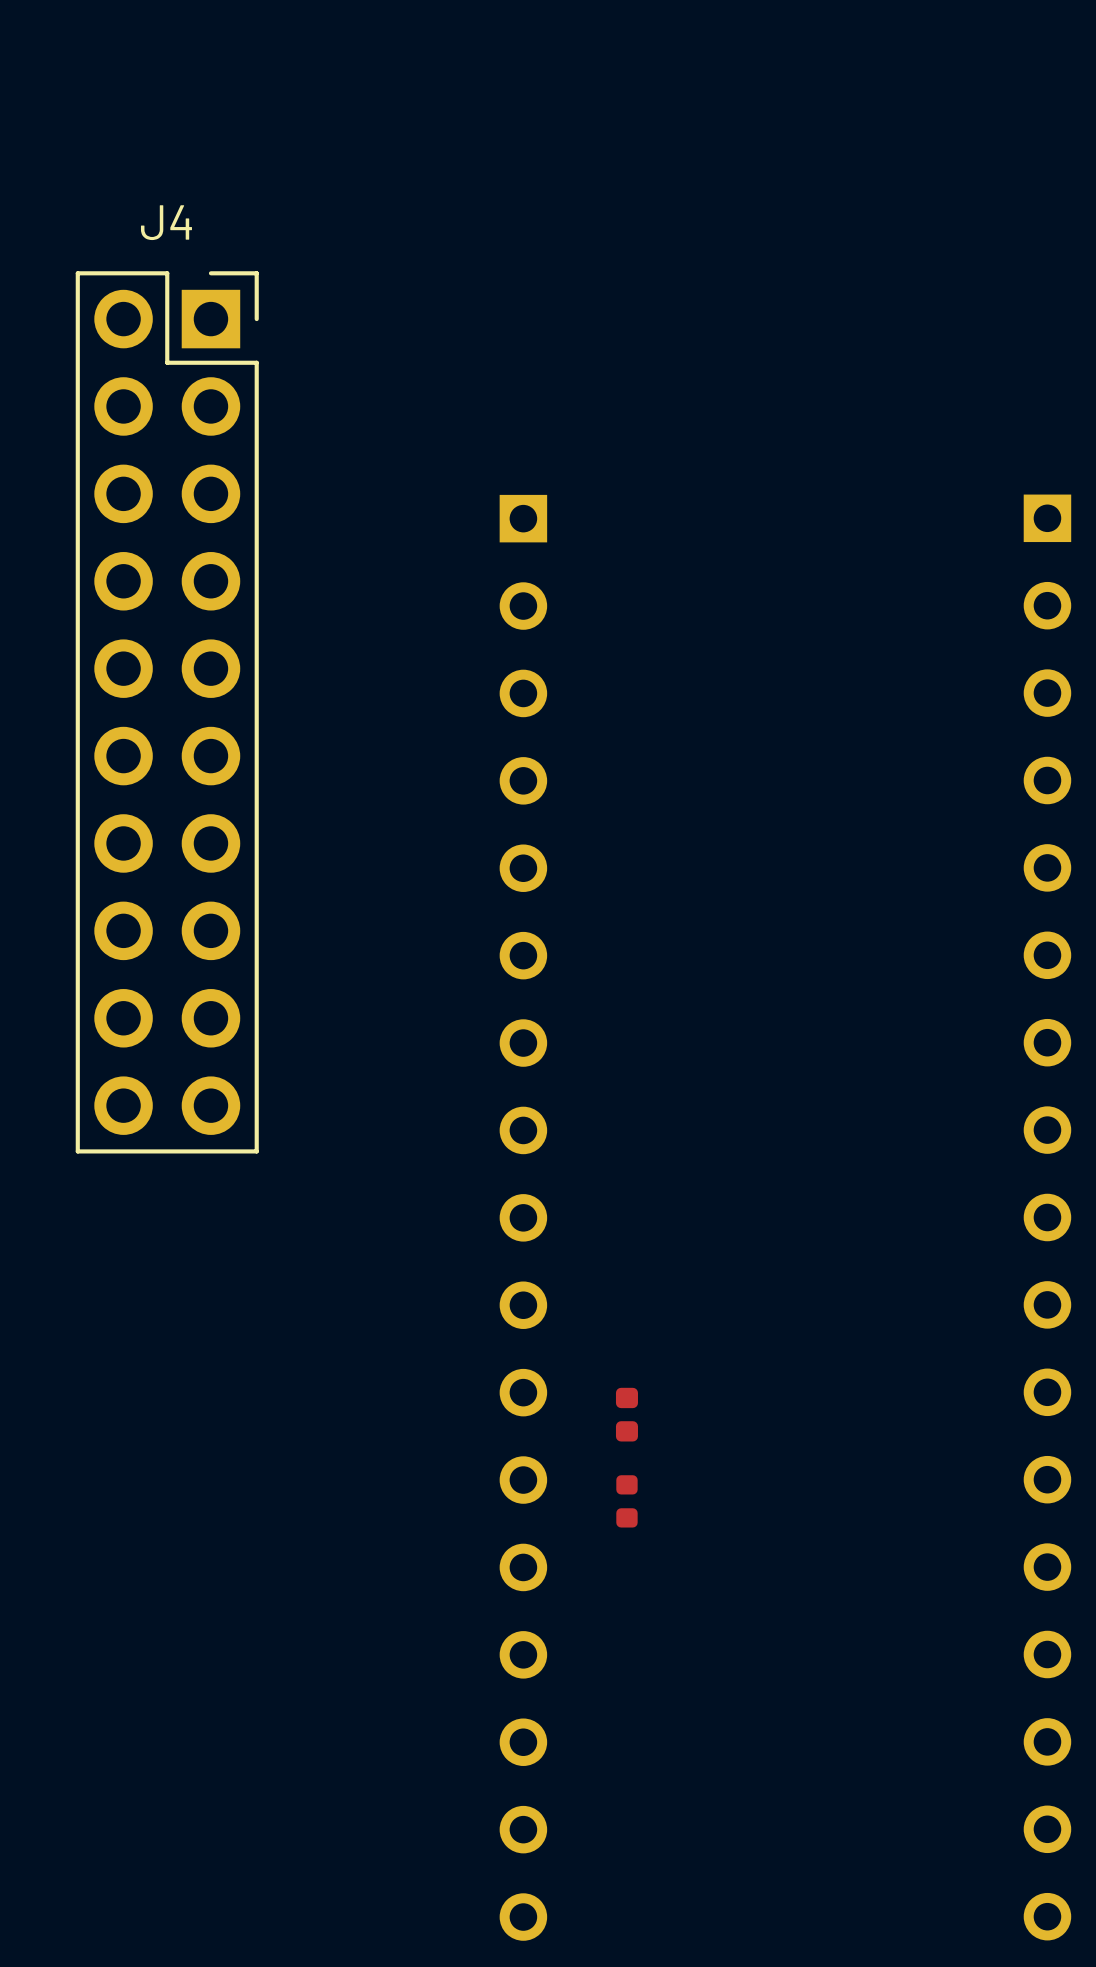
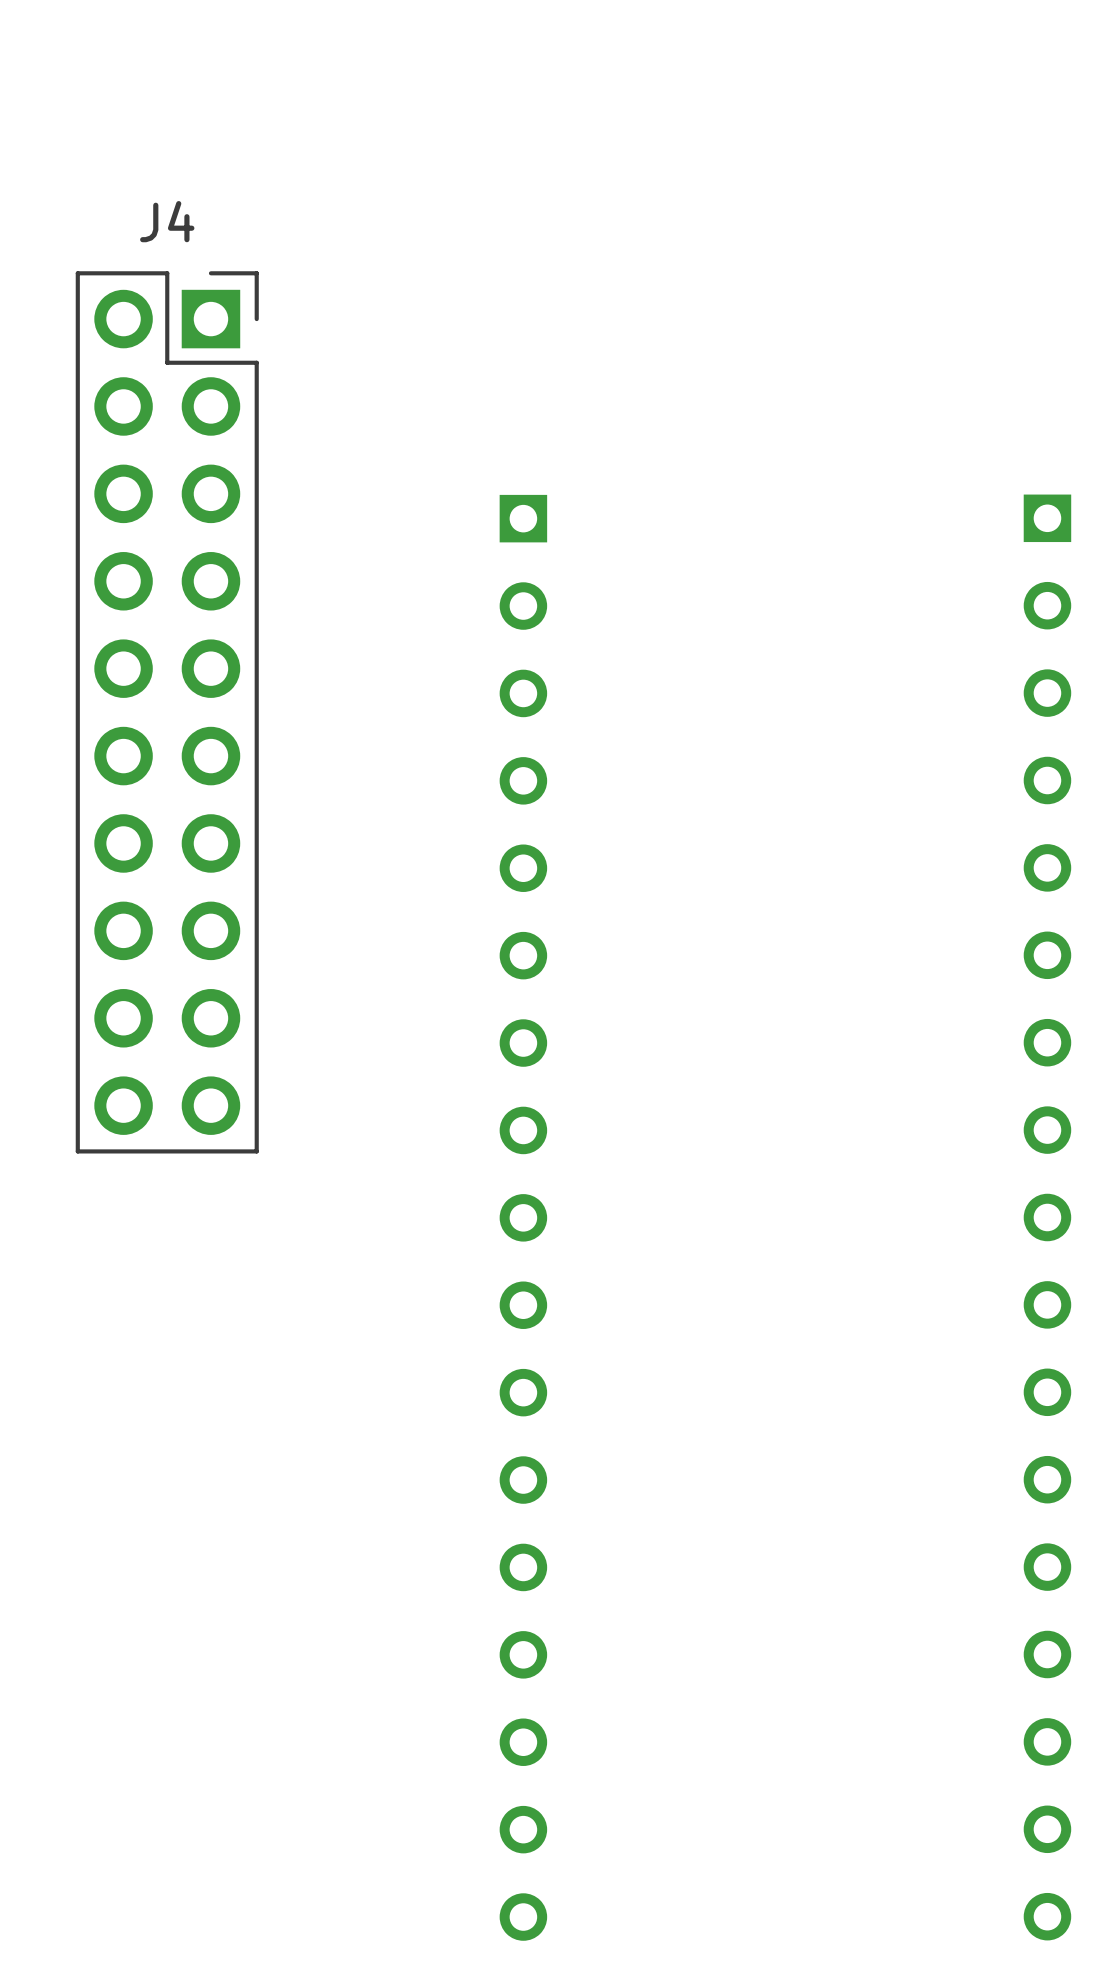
part: (626, 1414) -> none
part: (626, 1501) -> none

